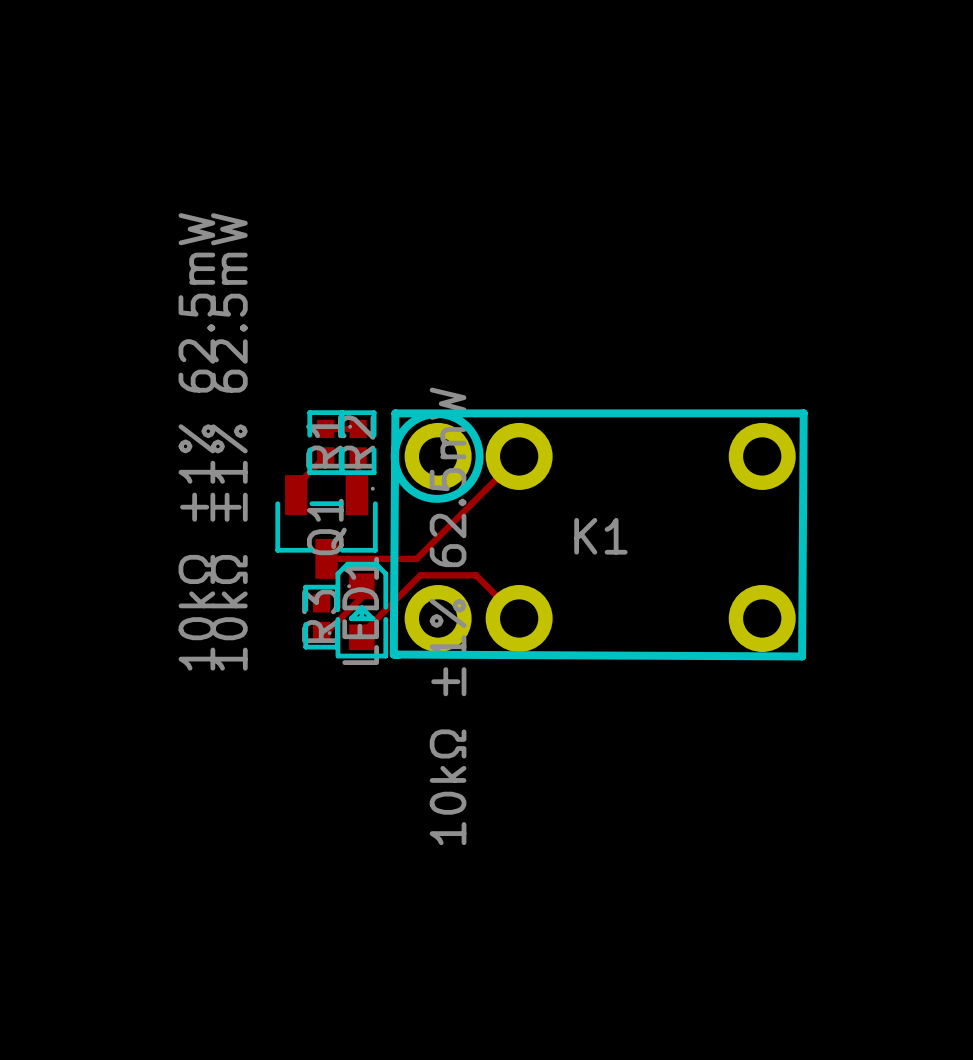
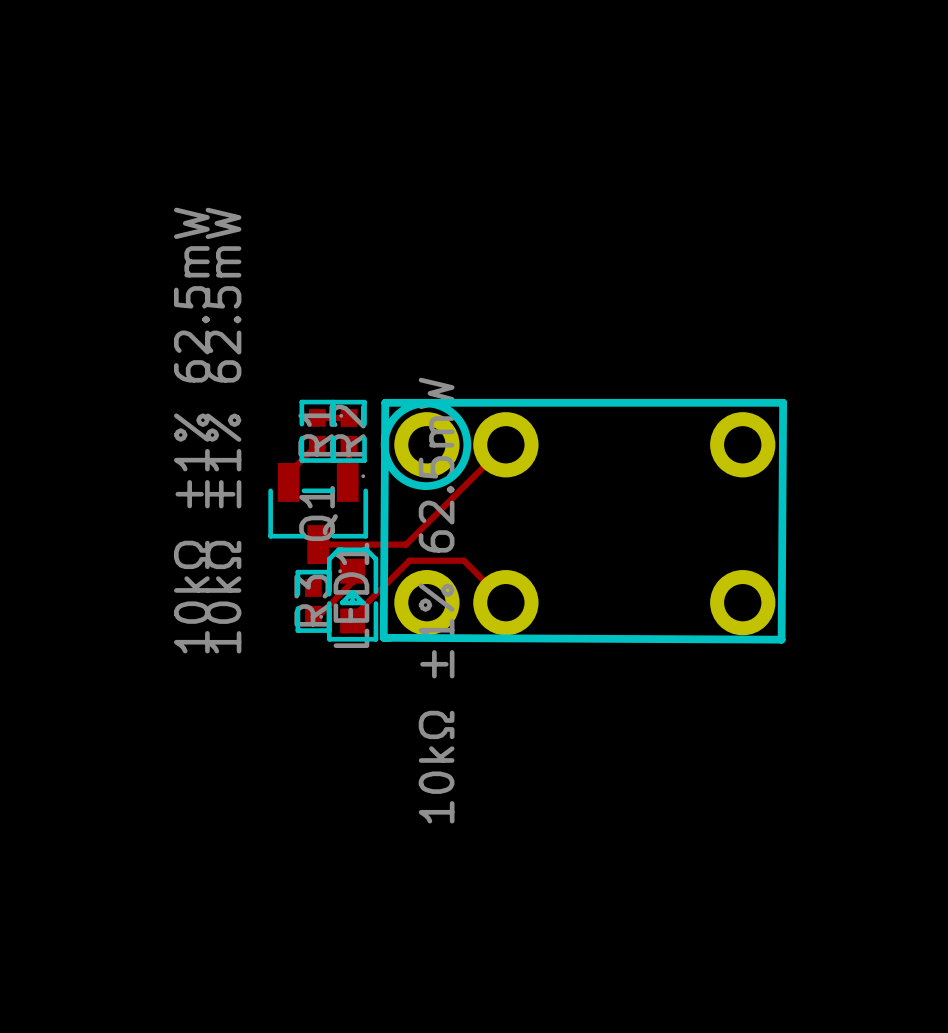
K1 name: K1 (600, 536) -> none

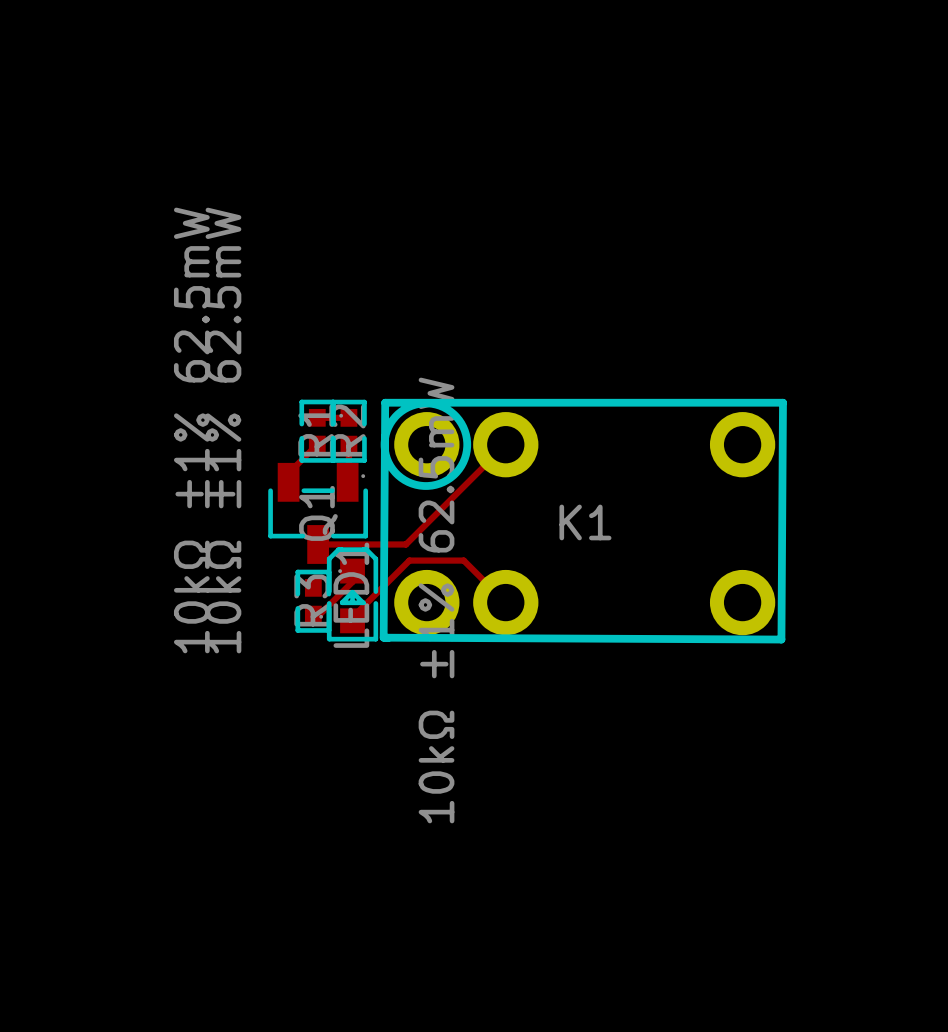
K1 name: none -> K1 (585, 522)

